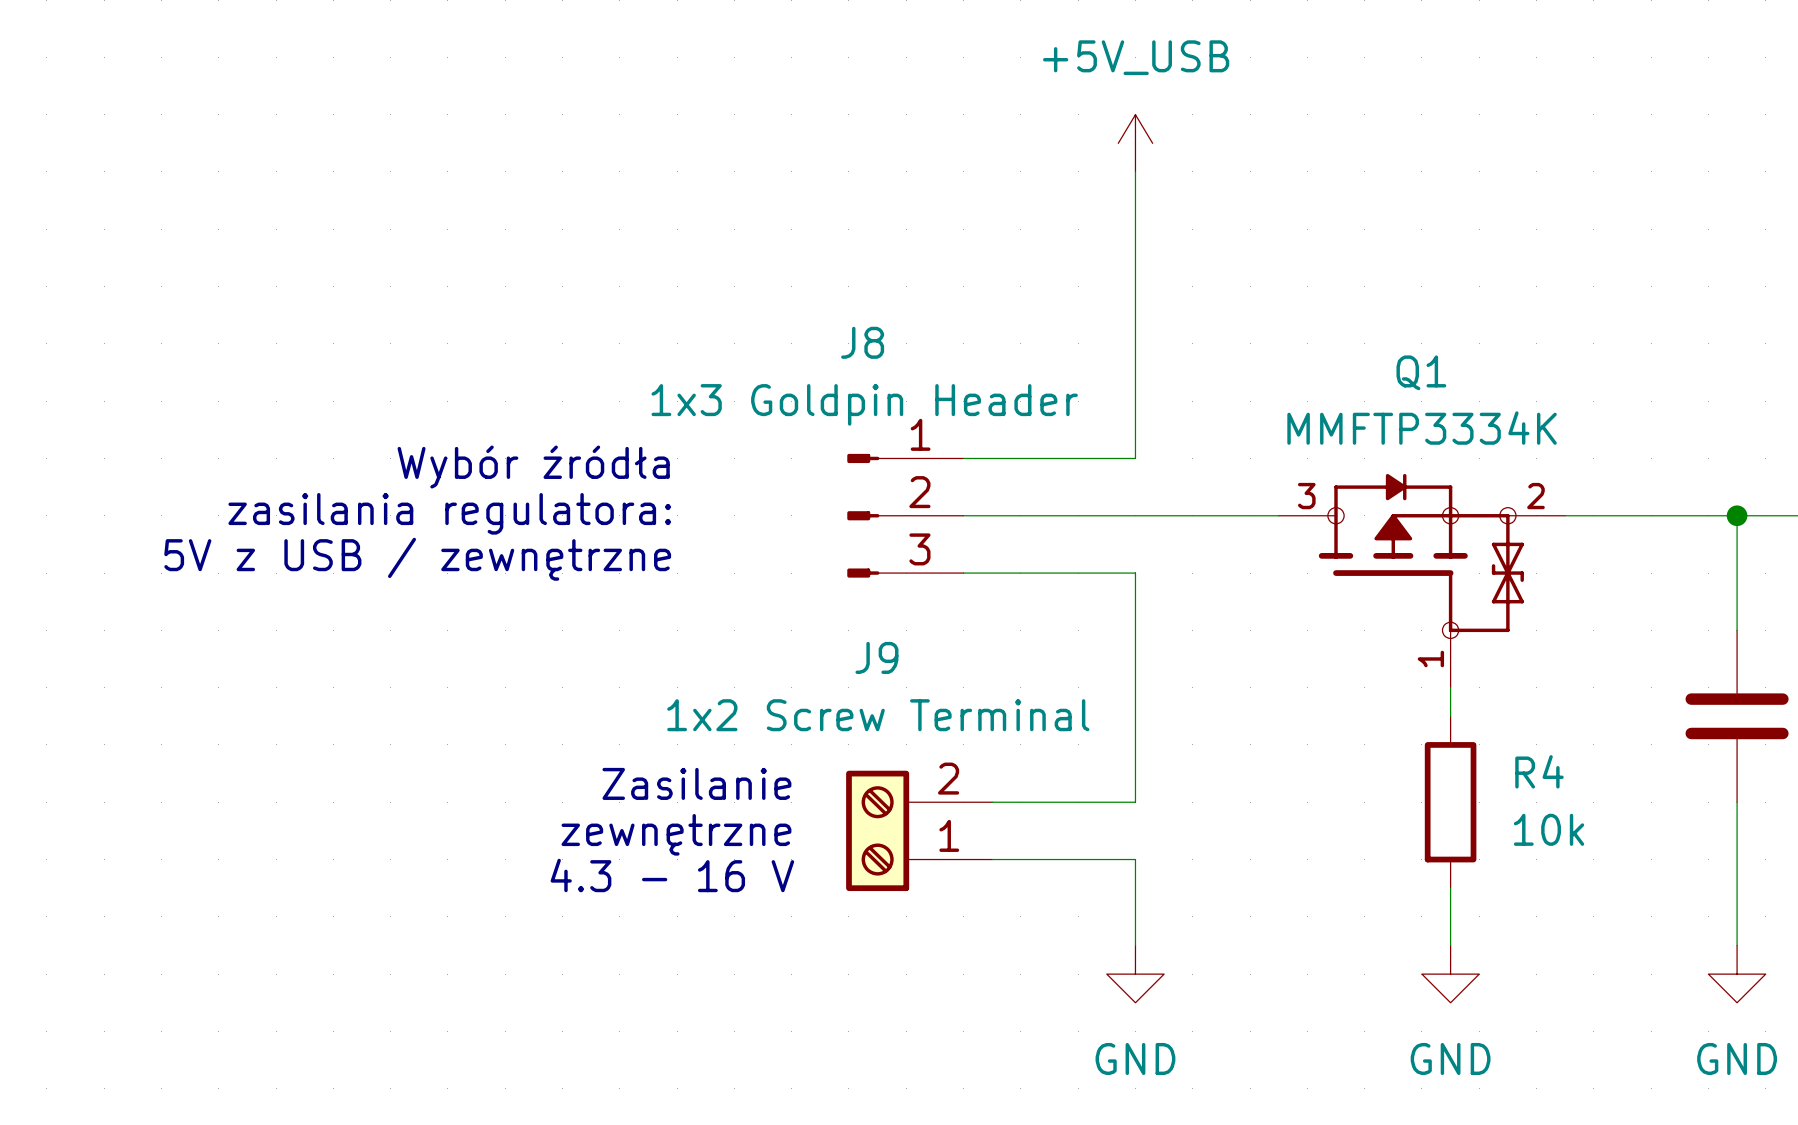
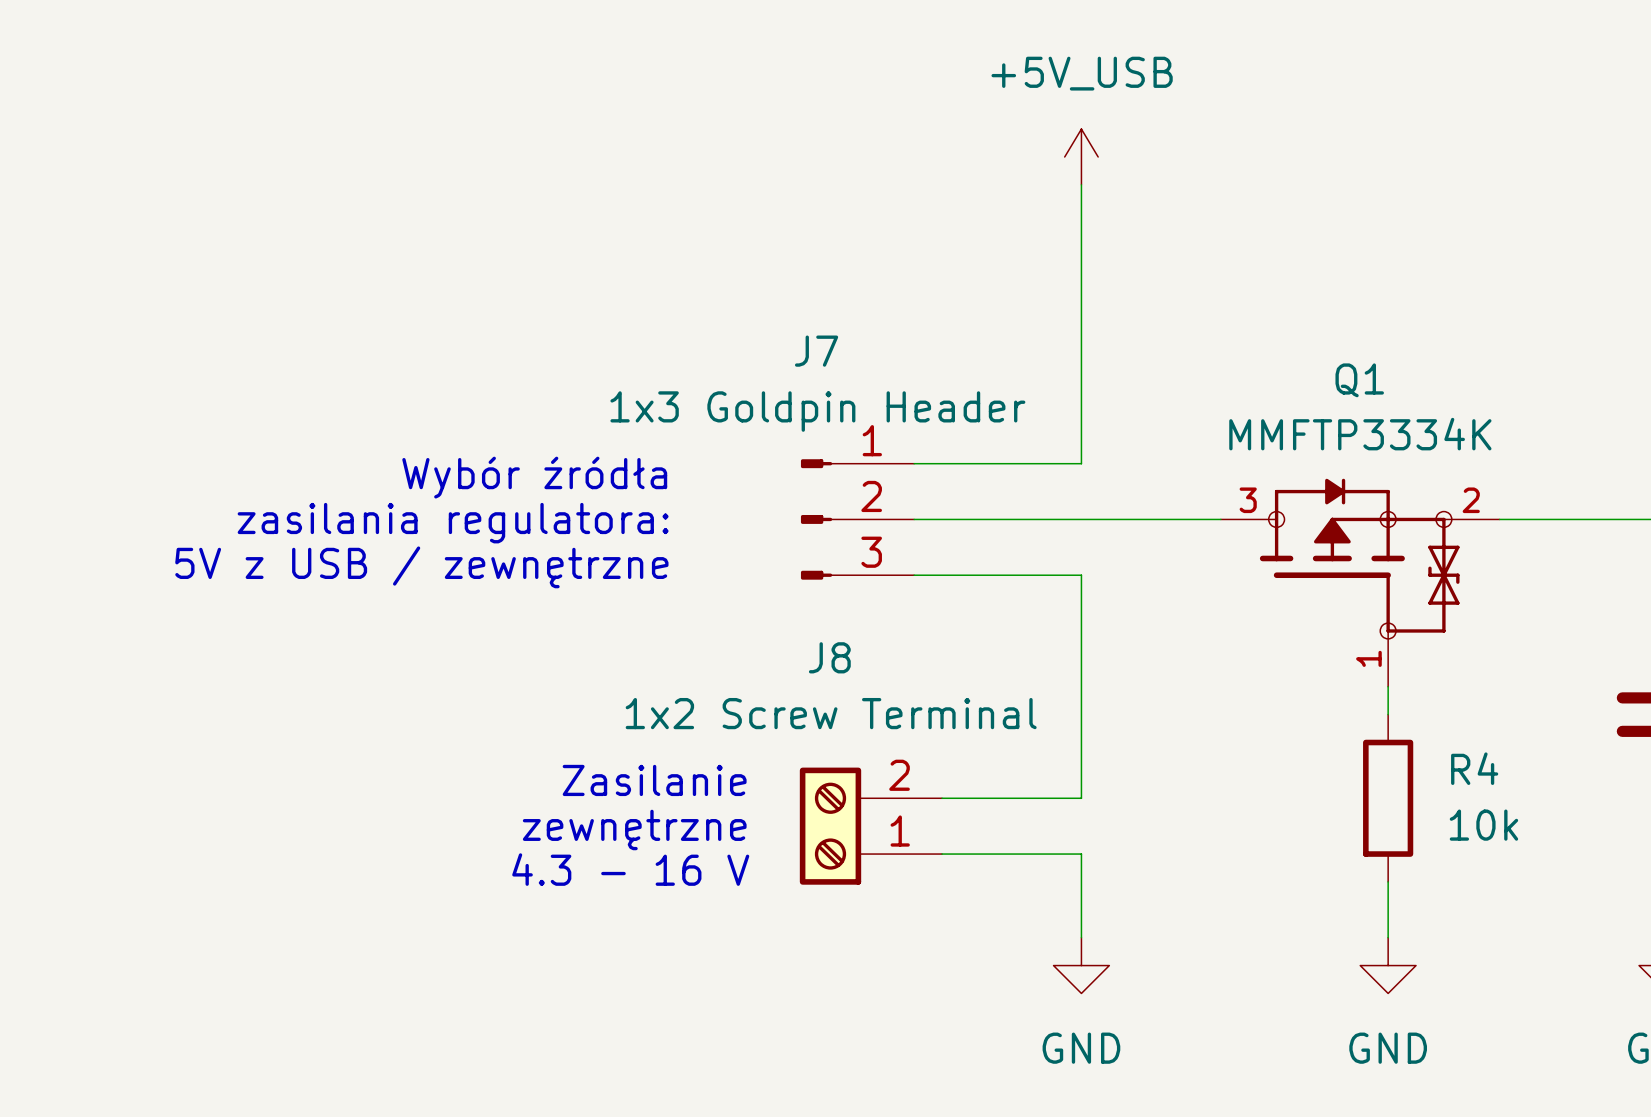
J8 name: J8 (862, 342) -> J7 (816, 351)
text position: Wybór źródła (533, 467) -> Wybór źródła (534, 477)
text position: zasilania regulatora: (449, 513) -> zasilania regulatora: (453, 523)
text position: 5V z USB / zewnętrzne (417, 559) -> 5V z USB / zewnętrzne (421, 567)
J9 name: J9 (876, 657) -> J8 (829, 657)

